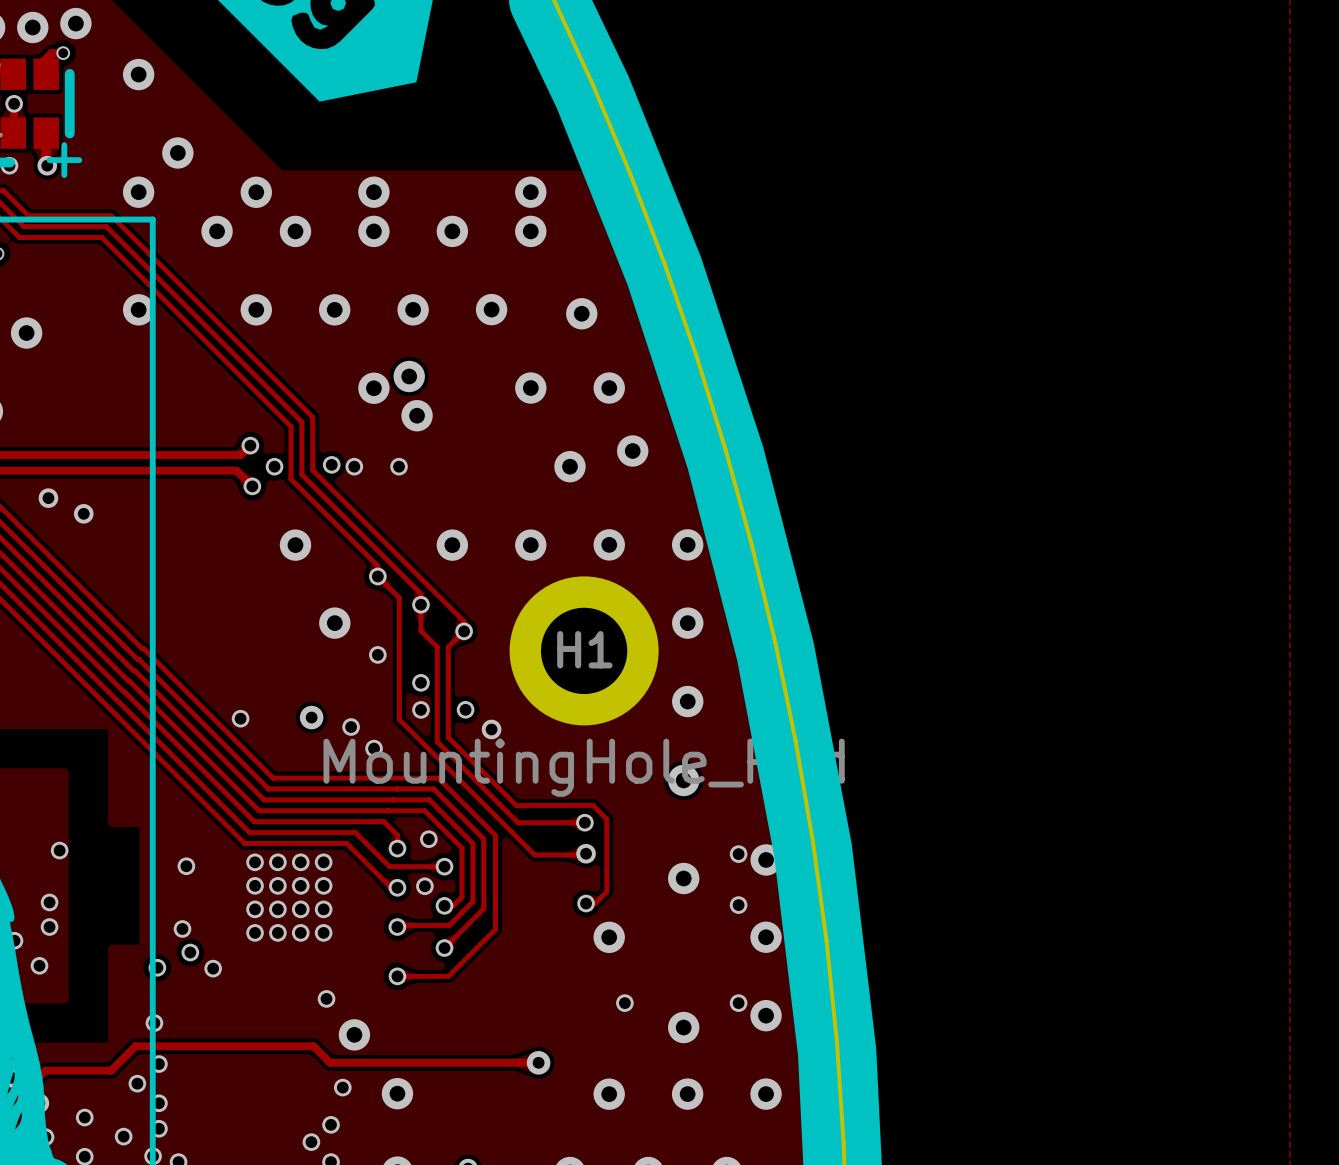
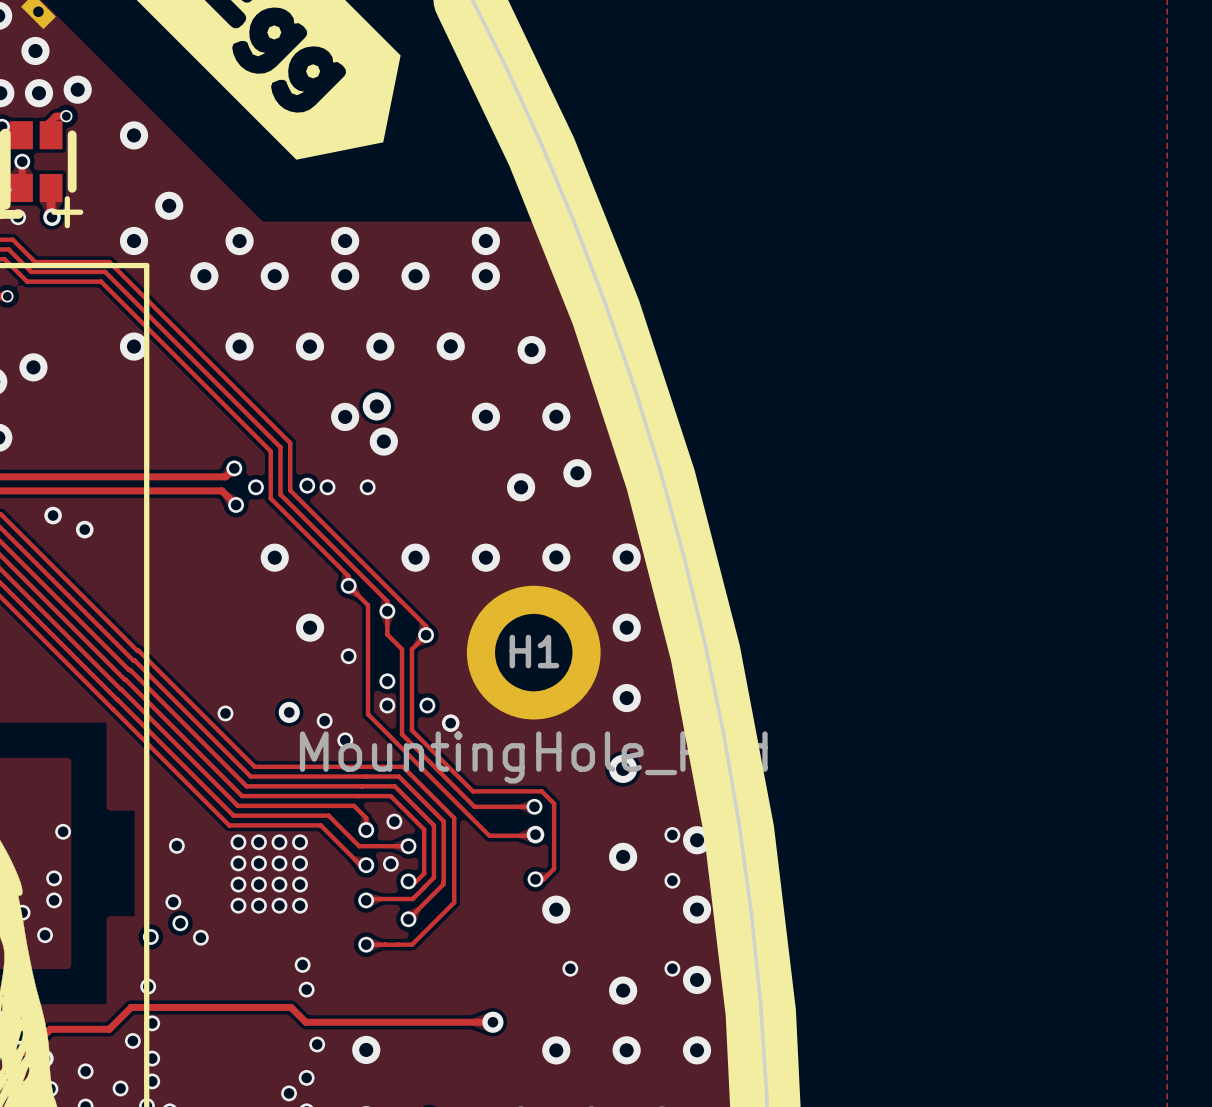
via size: [338, 1019, 371, 1051] -> [298, 981, 315, 998]

